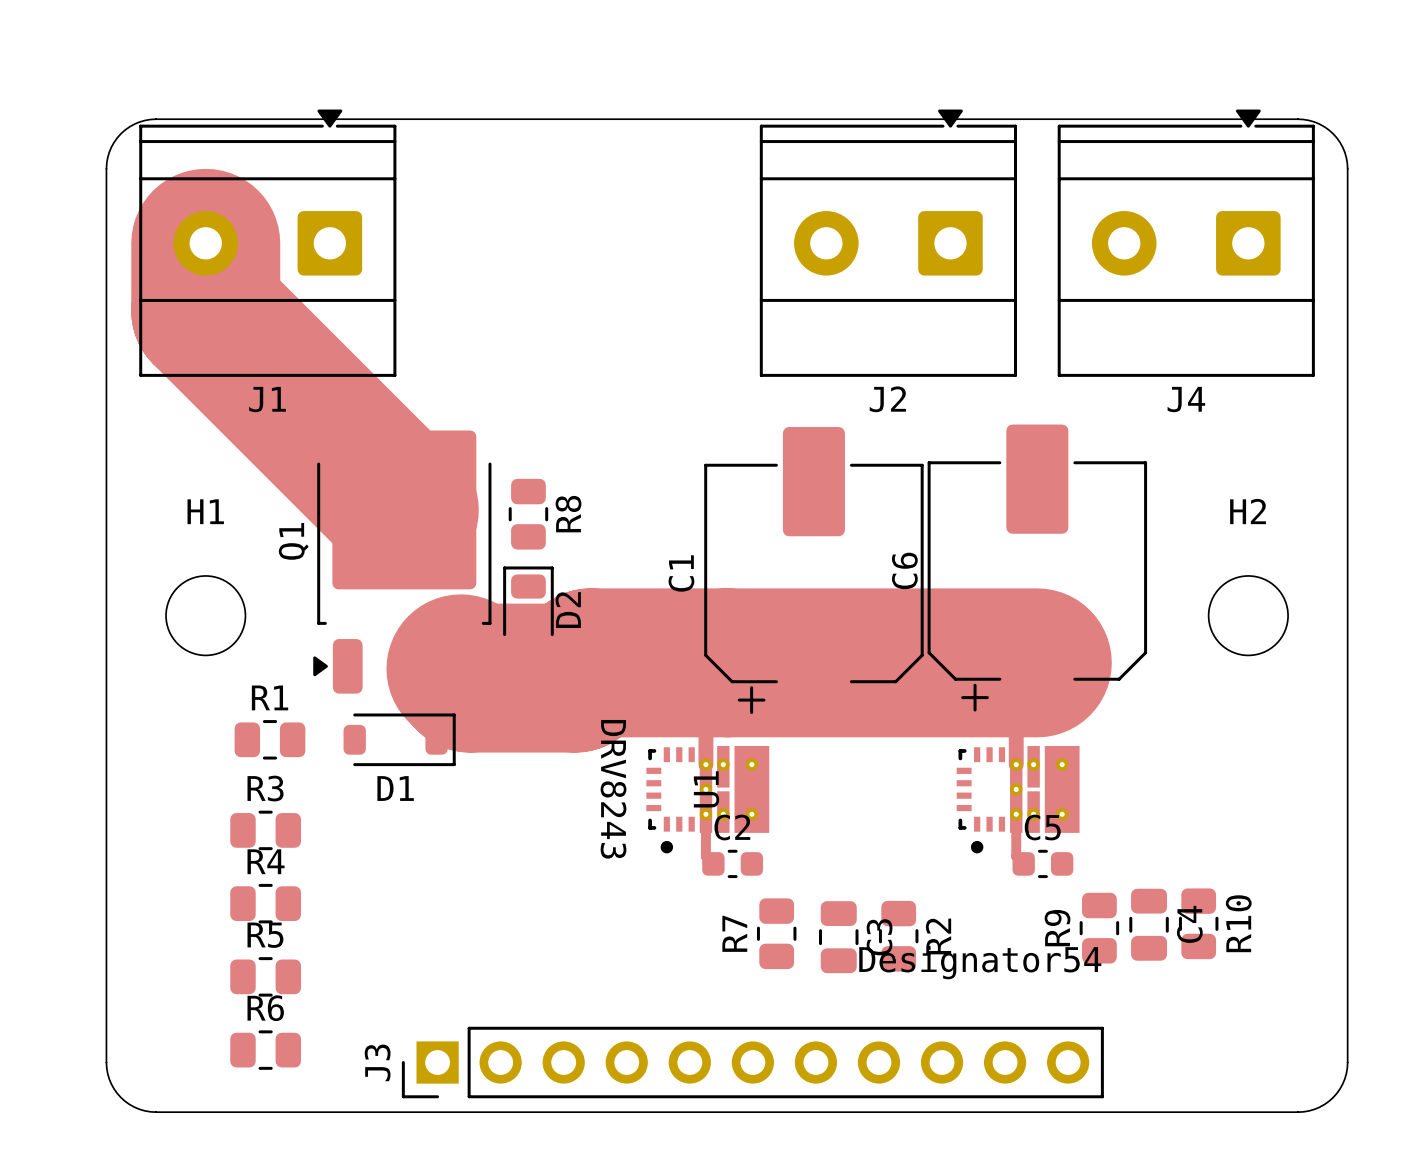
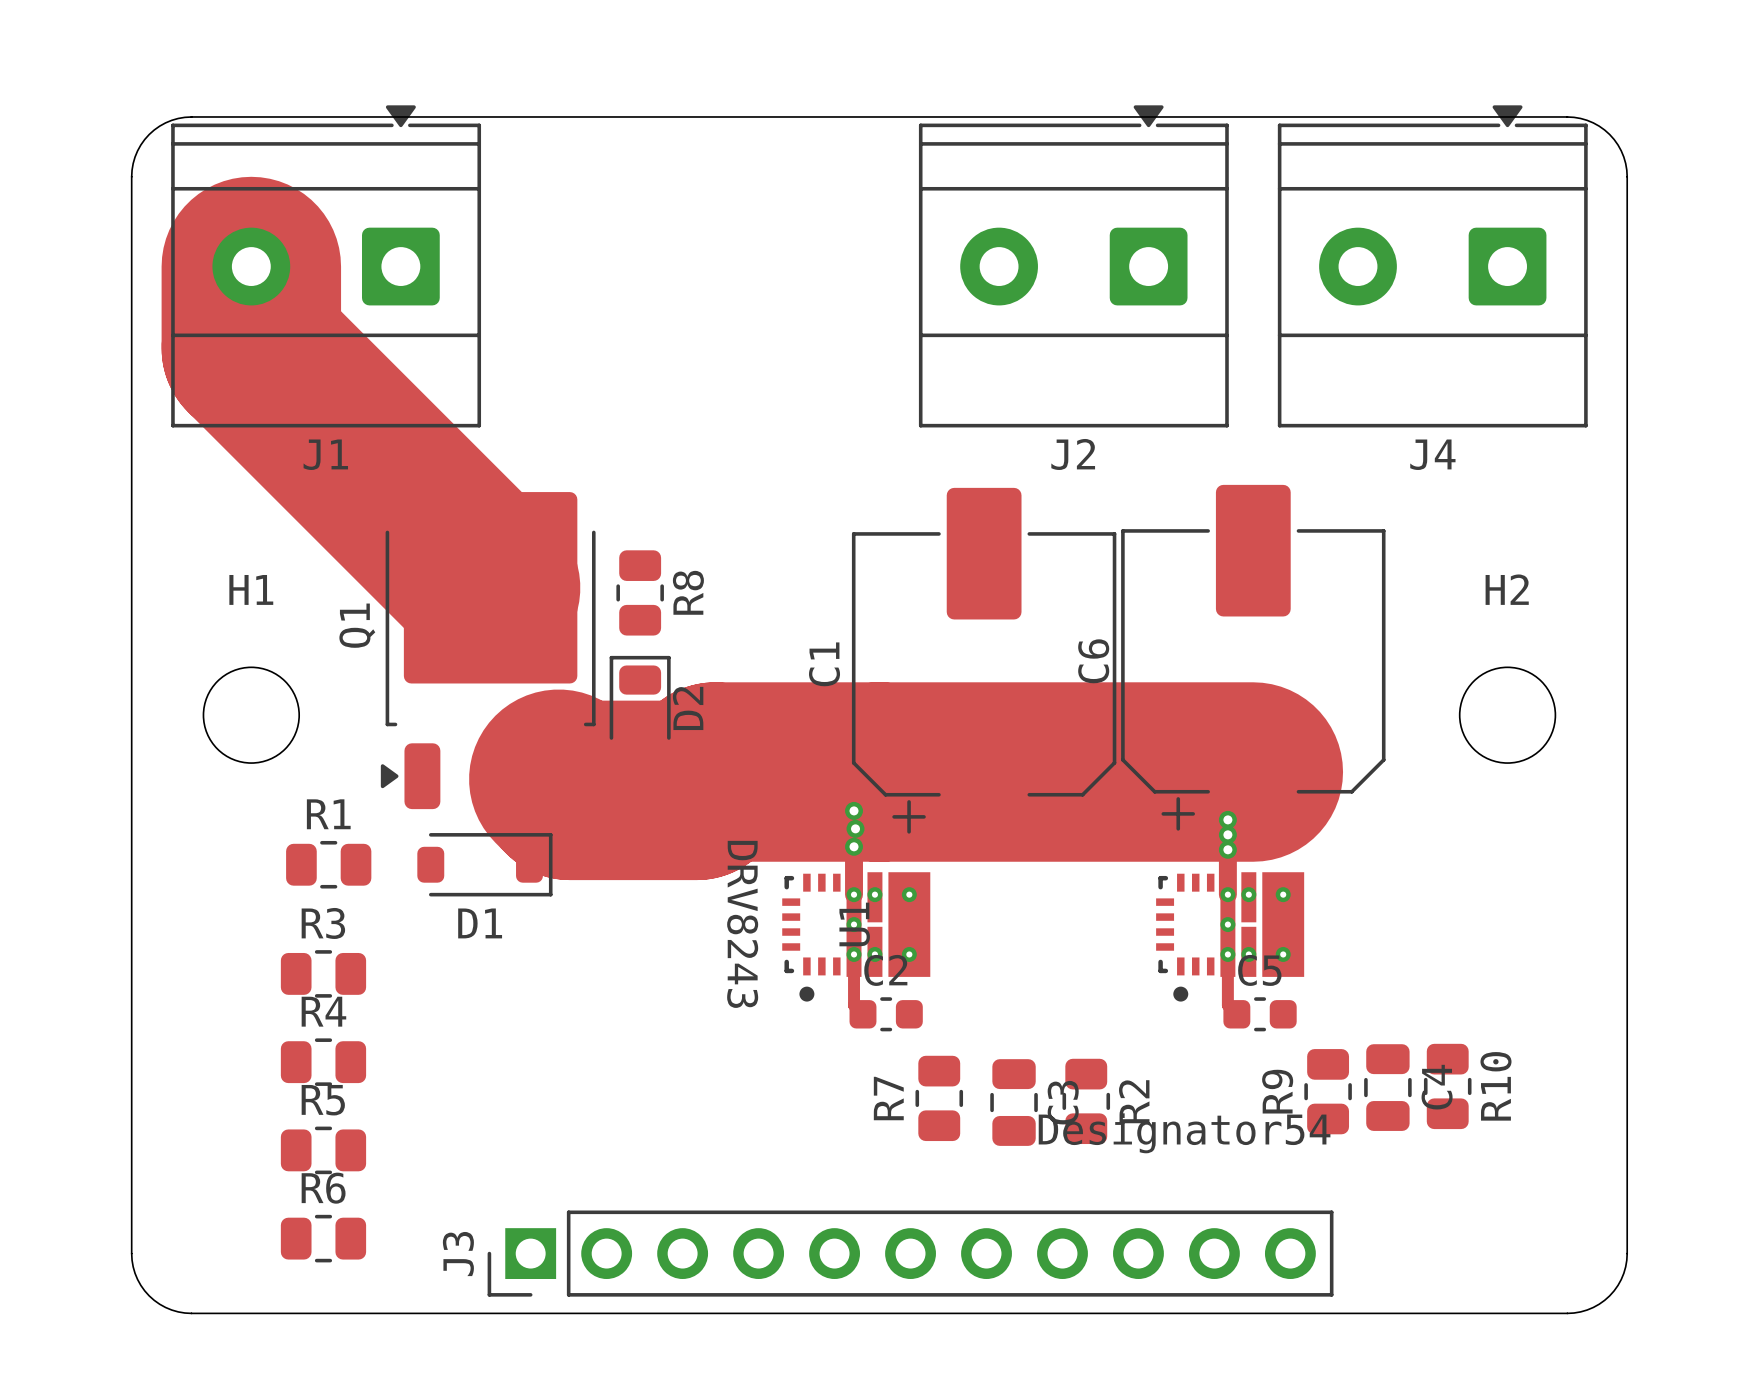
via: none -> (854, 810)
via: none -> (1227, 819)
via: none -> (855, 828)
via: none -> (1227, 834)
via: none -> (854, 846)
via: none -> (1227, 849)

